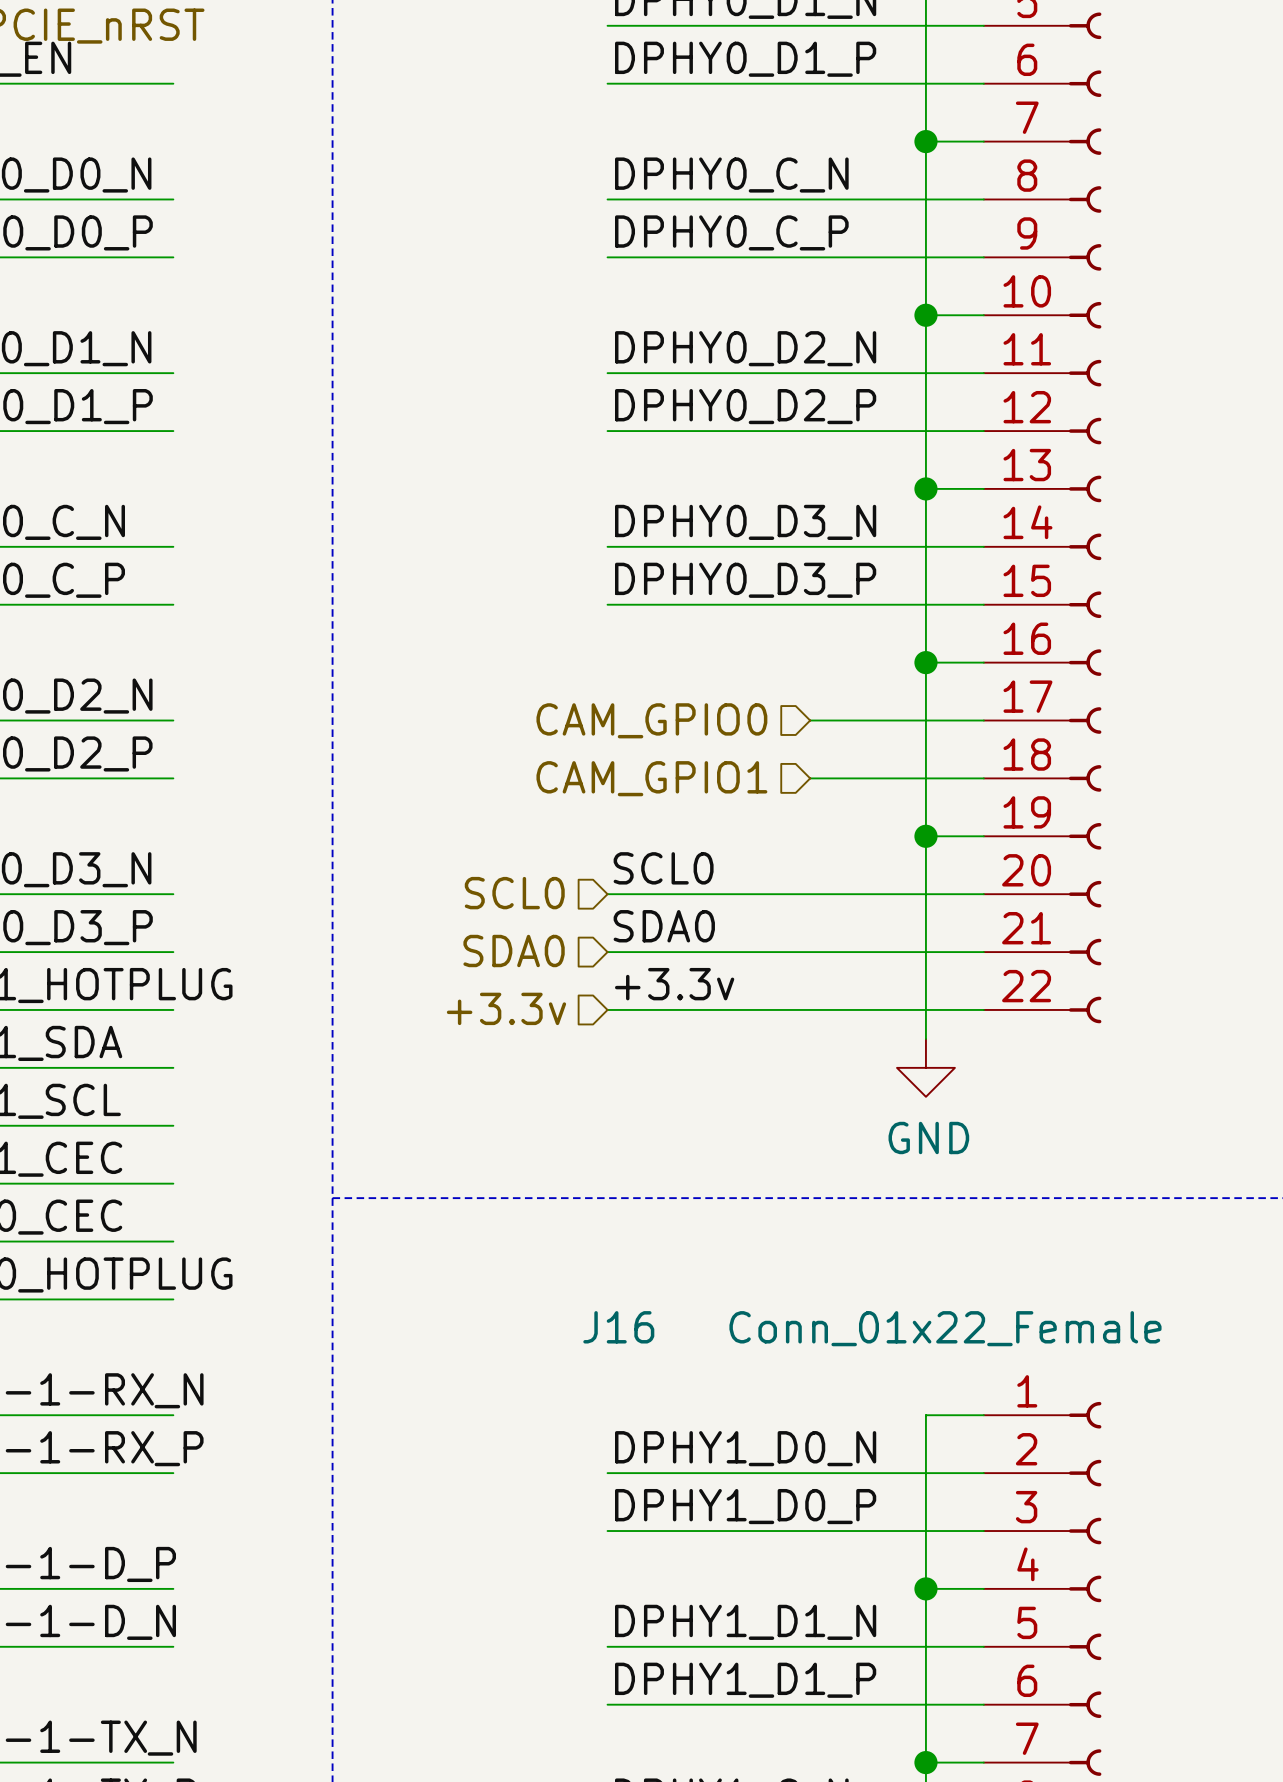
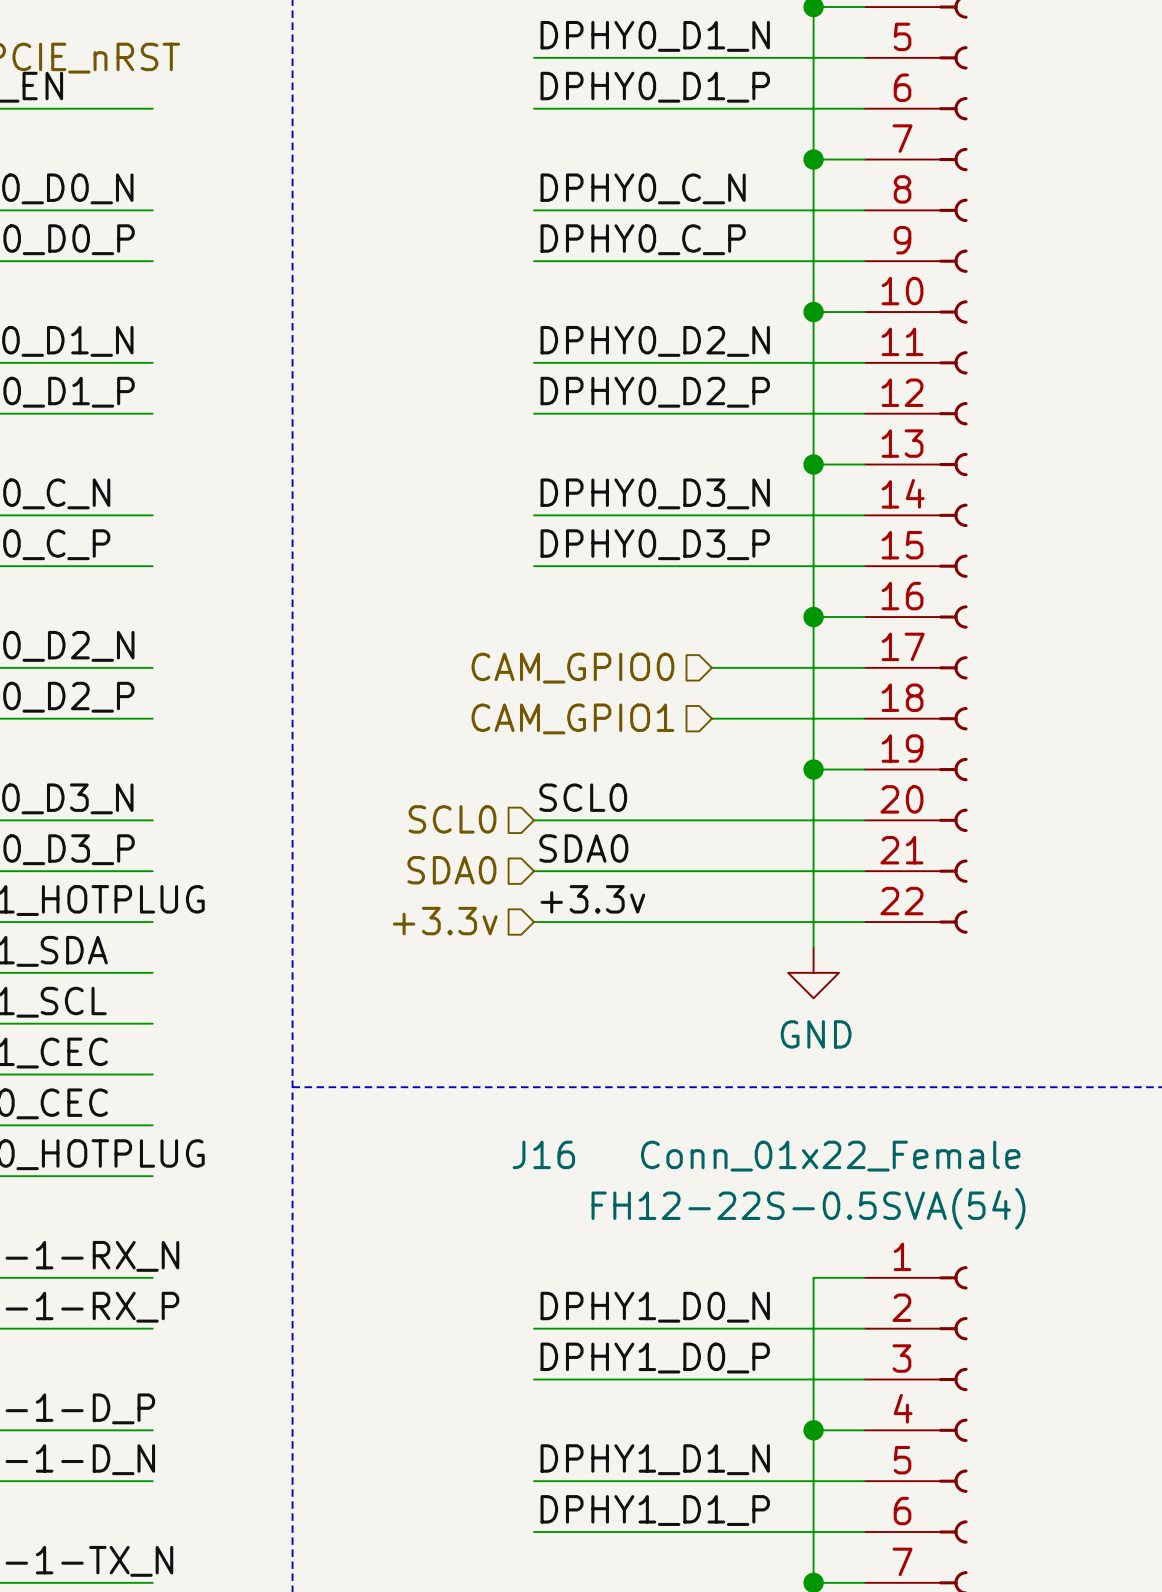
J16 name position: J16 (618, 1327) -> J16 (543, 1154)
J16 value position: Conn_01x22_Female (945, 1328) -> Conn_01x22_Female (830, 1156)
J16 text: none -> FH12-22S-0.5SVA(54) (808, 1208)

